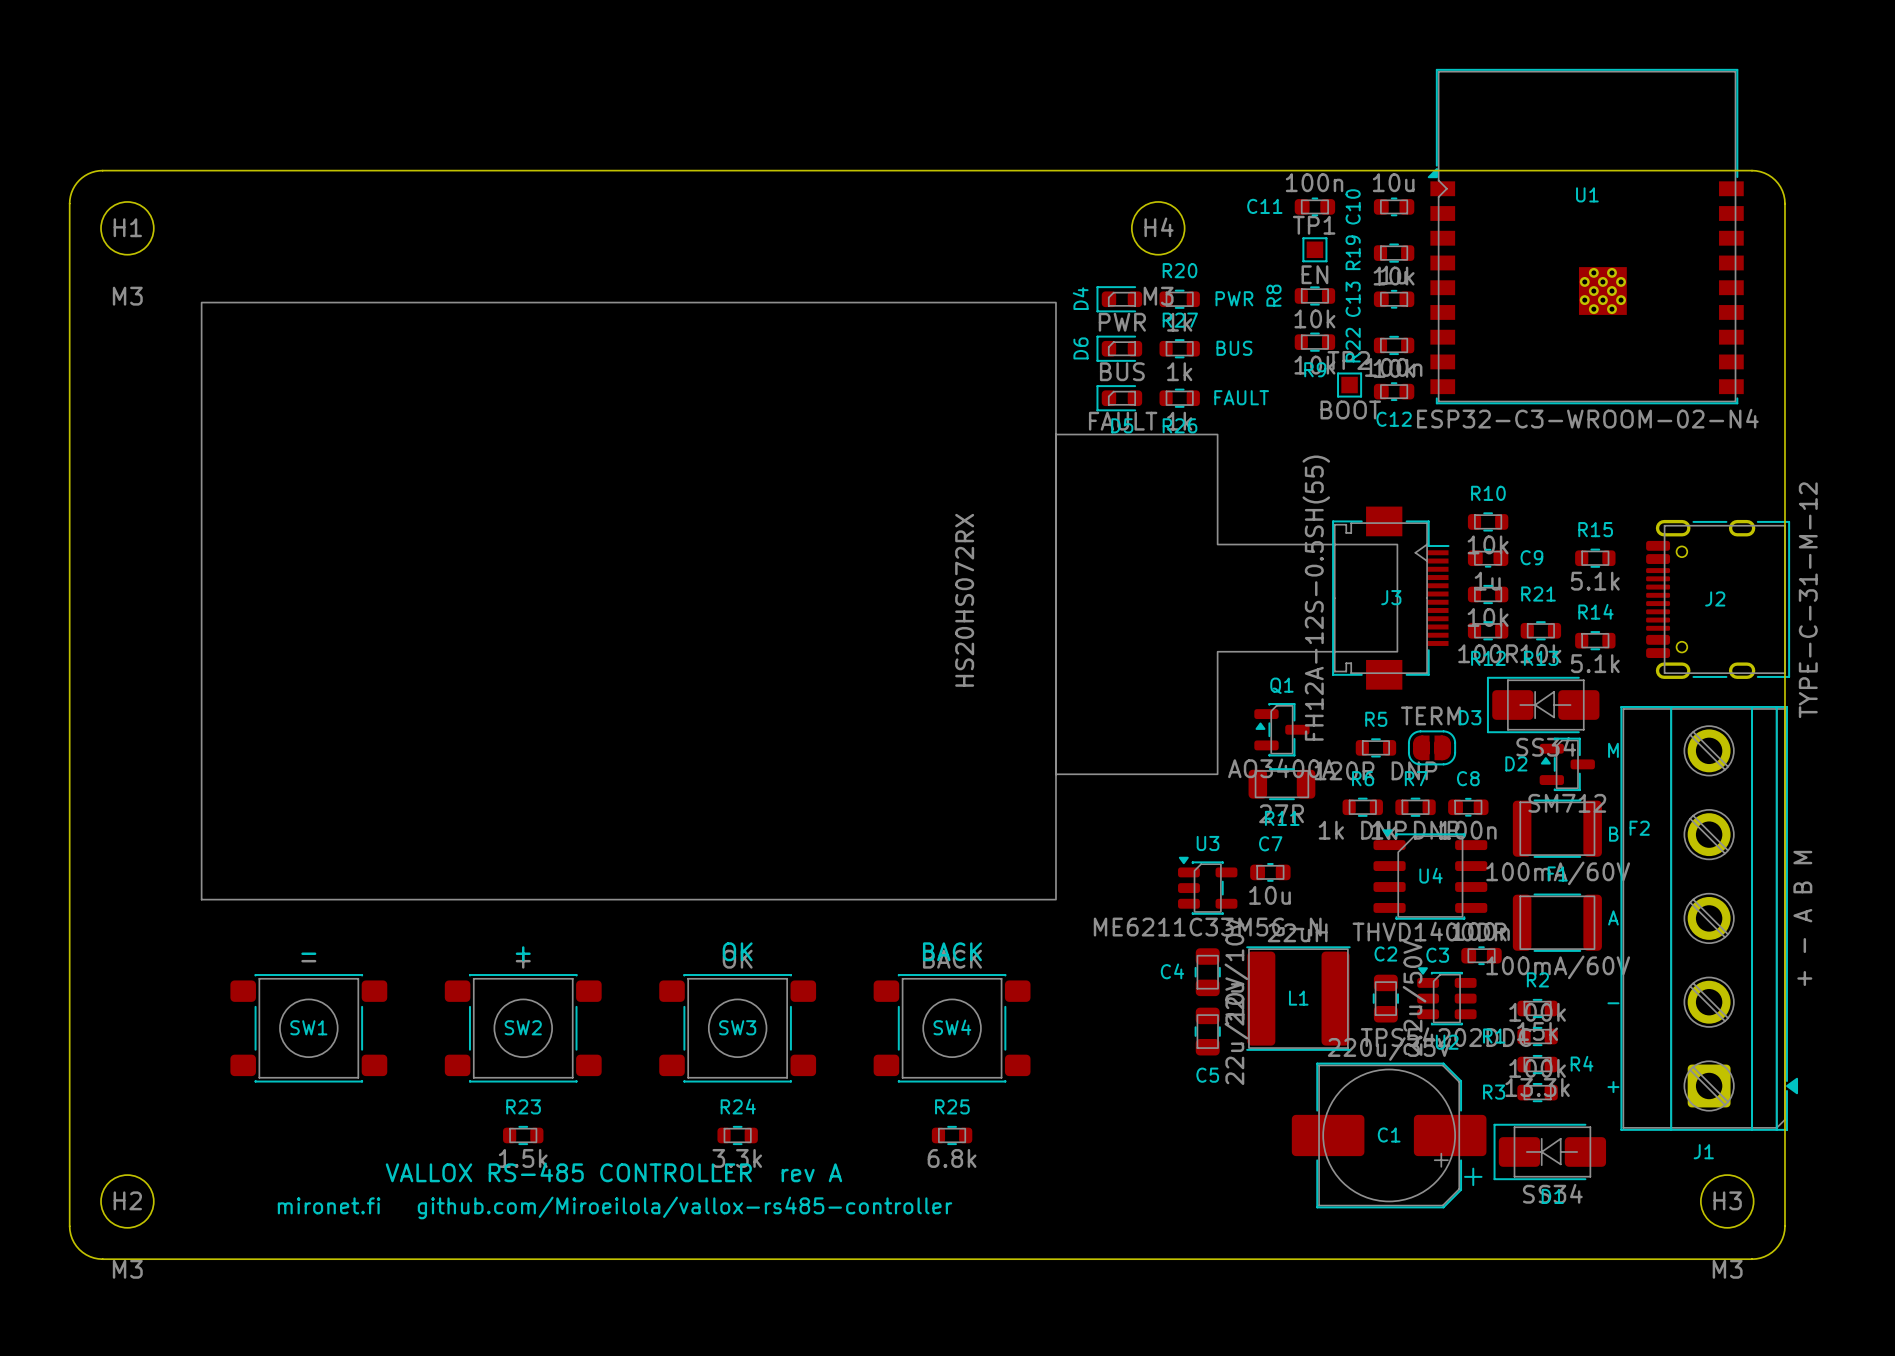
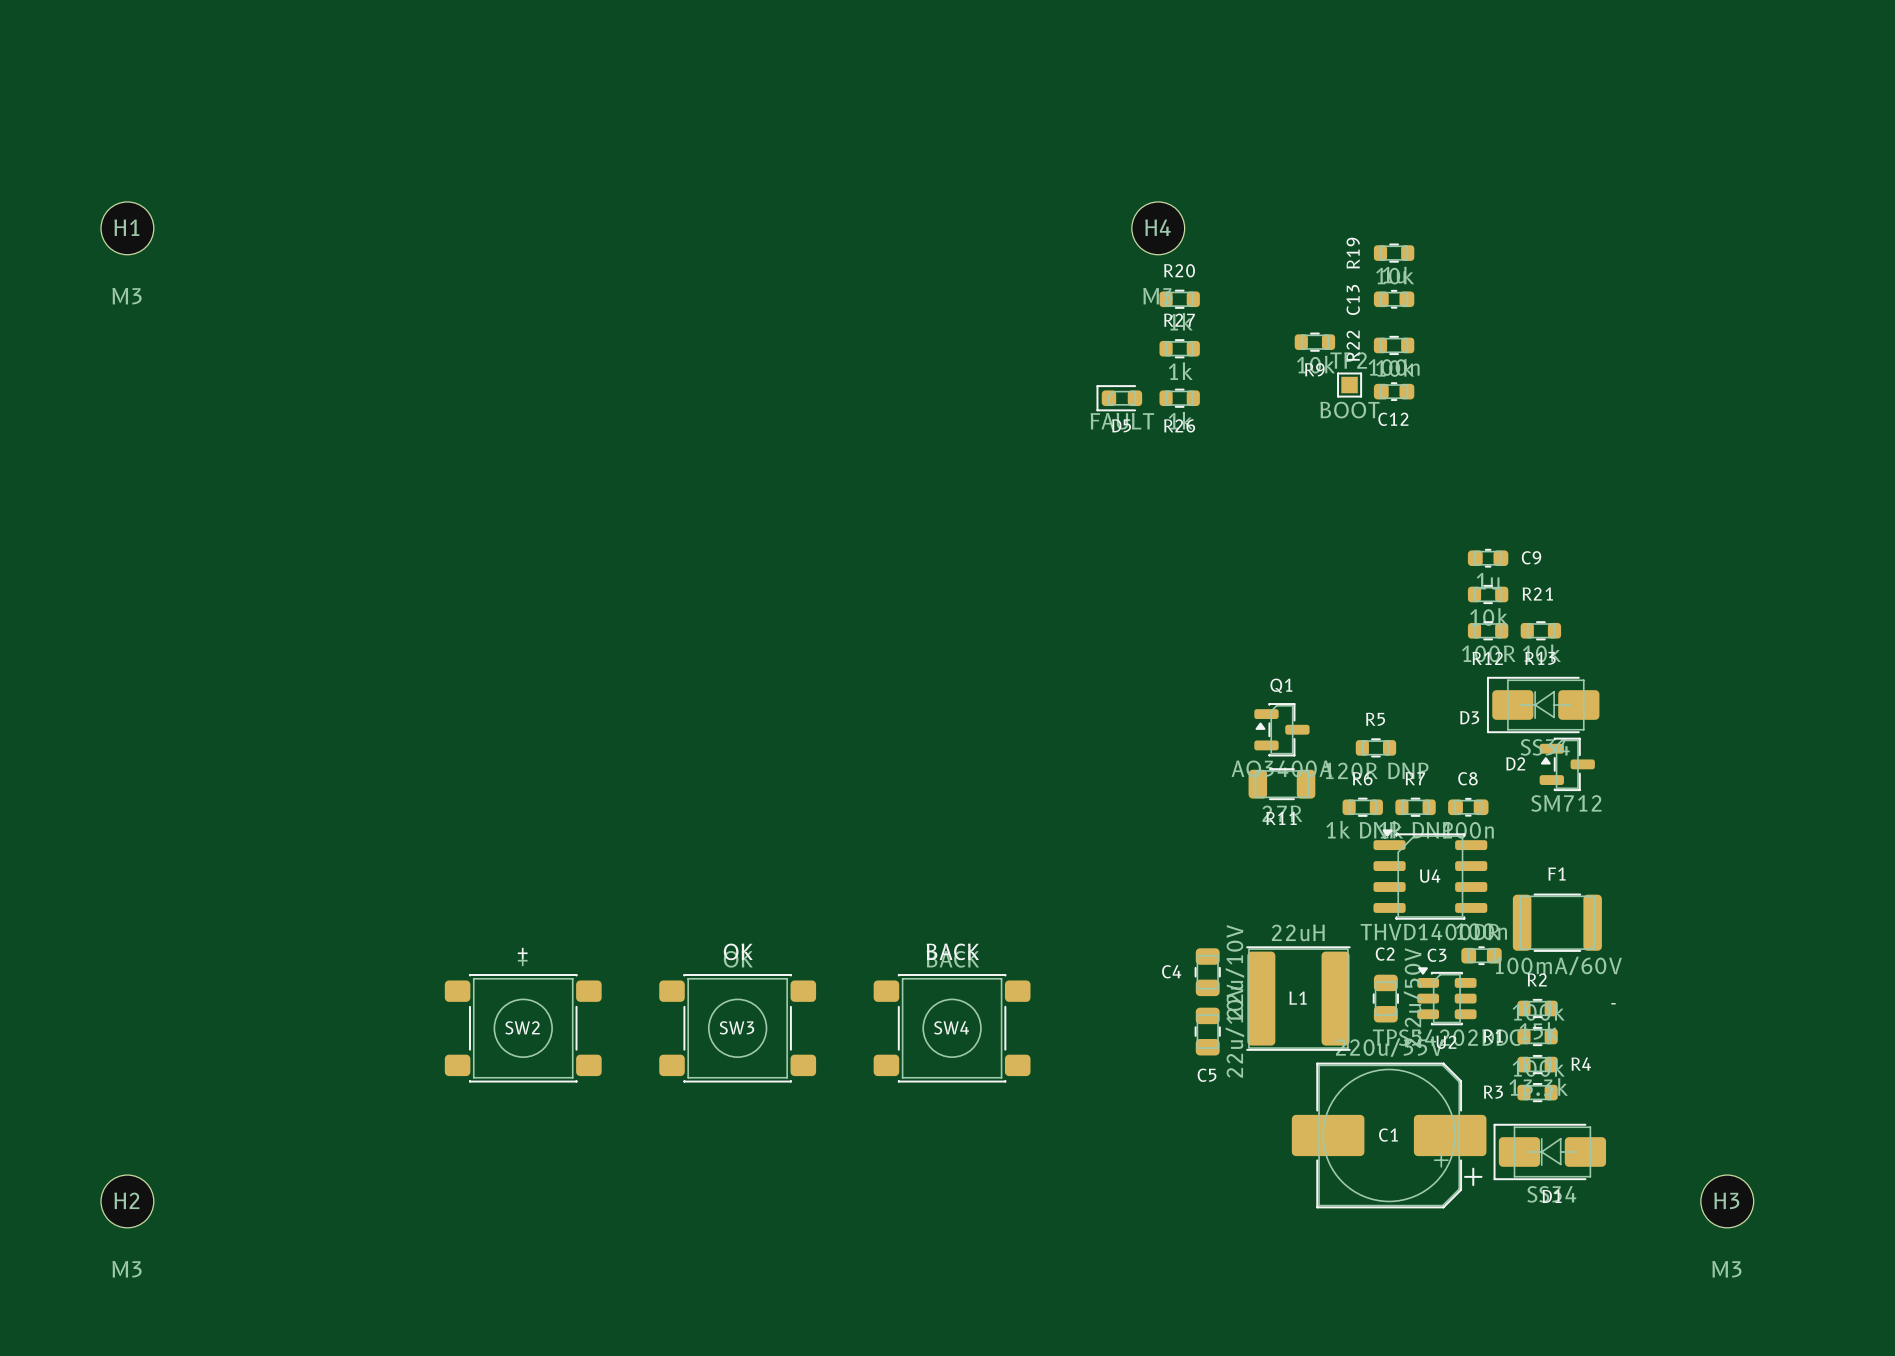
board edge: (102, 170) (1752, 170) (1768, 175) (1780, 187) (1784, 203) (1784, 1226) (1780, 1242) (1768, 1254) (1752, 1259) (102, 1259) (86, 1254) (74, 1242) (69, 1226) (69, 203) (71, 192) (79, 180) (88, 173) (102, 170) -> none
C11: 100n (1314, 206) -> none
C10: 10u (1394, 206) -> none
U1: ESP32-C3-WROOM-02-N4 (1585, 236) -> none
TP1: EN (1314, 249) -> none
R8: 10k (1314, 295) -> none
text: PWR (1234, 298) -> none
D4: PWR (1119, 299) -> none
drawing: [200, 301, 1399, 901] -> none
D6: BUS (1119, 348) -> none
text: BUS (1234, 348) -> none
text: FAULT (1241, 397) -> none
R10: 10k (1488, 521) -> none
R15: 5.1k (1595, 558) -> none
J3: FH12A-12S-0.5SH(55) (1390, 598) -> none
J2: TYPE-C-31-M-12 (1718, 599) -> none
R14: 5.1k (1595, 640) -> none
part: TERM (1432, 747) -> none
text: M (1613, 750) -> none
F2: 100mA/60V (1557, 828) -> none
text: B (1613, 834) -> none
C7: 10u (1270, 872) -> none
U3: ME6211C33M5G-N (1207, 885) -> none
text: A (1613, 917) -> none
J1: + - A B M (1709, 918) -> none
text: - (308, 953) -> none
SW1: - (308, 1028) -> none
text: + (1613, 1087) -> none
R23: 1.5k (523, 1135) -> none
R24: 3.3k (737, 1135) -> none
R25: 6.8k (952, 1135) -> none
text: VALLOX RS-485 CONTROLLER rev A (613, 1172) -> none
text: mironet.fi github.com/Miroeilola/vallox-rs485-controller (615, 1207) -> none

